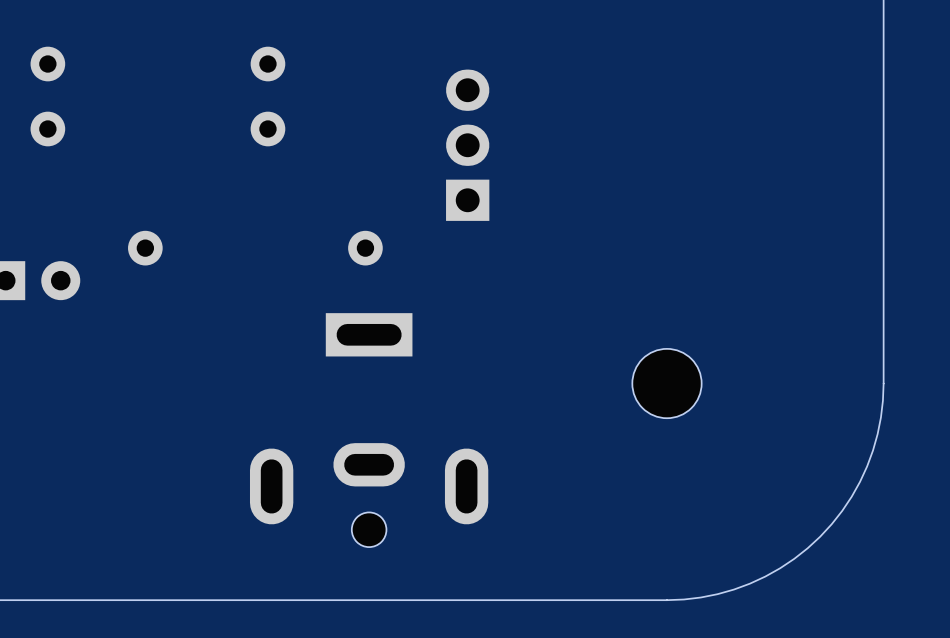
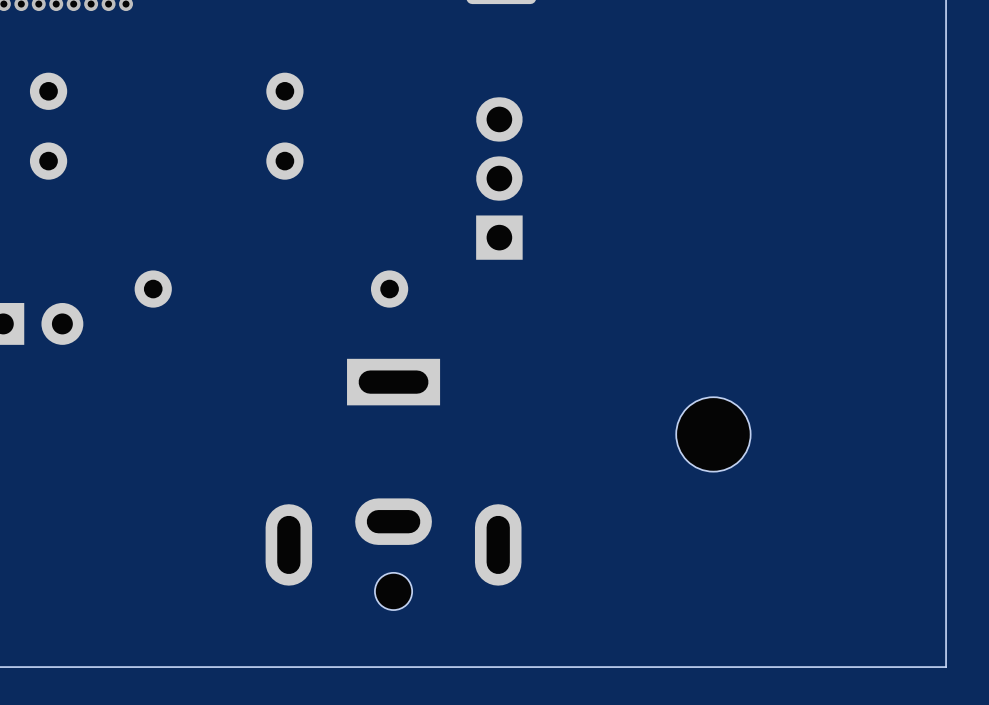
board edge: (883, 383) (880, 417) (867, 466) (851, 496) (820, 536) (794, 558) (749, 583) (717, 594) (666, 600) -> (946, 434) (946, 667) (713, 667)

